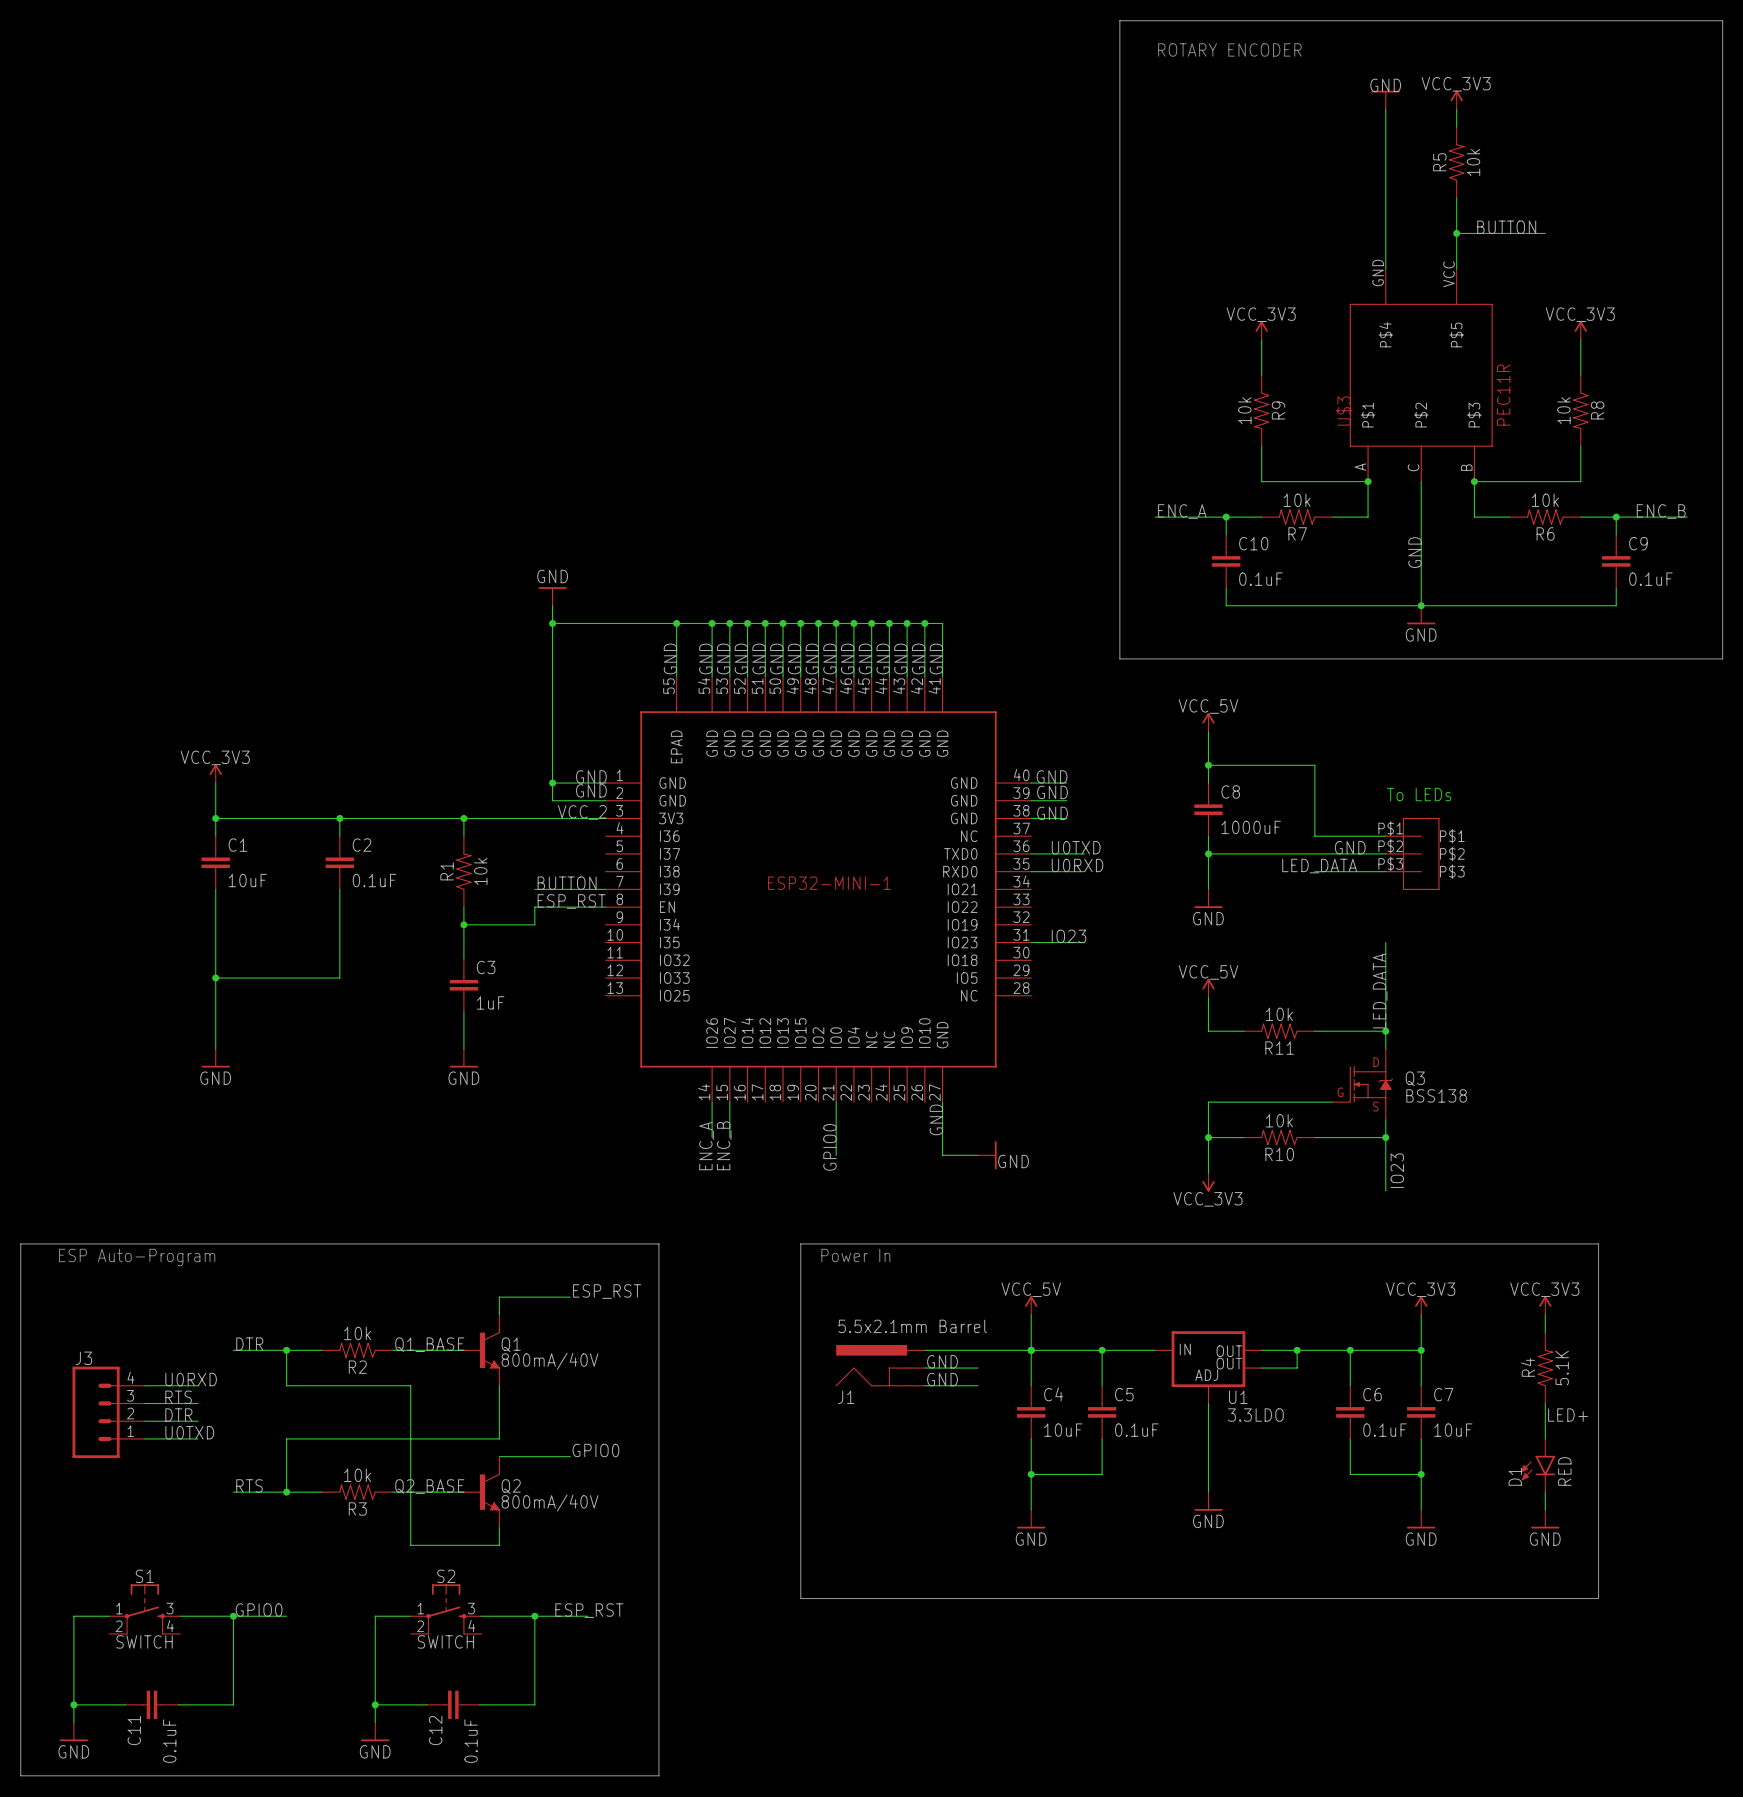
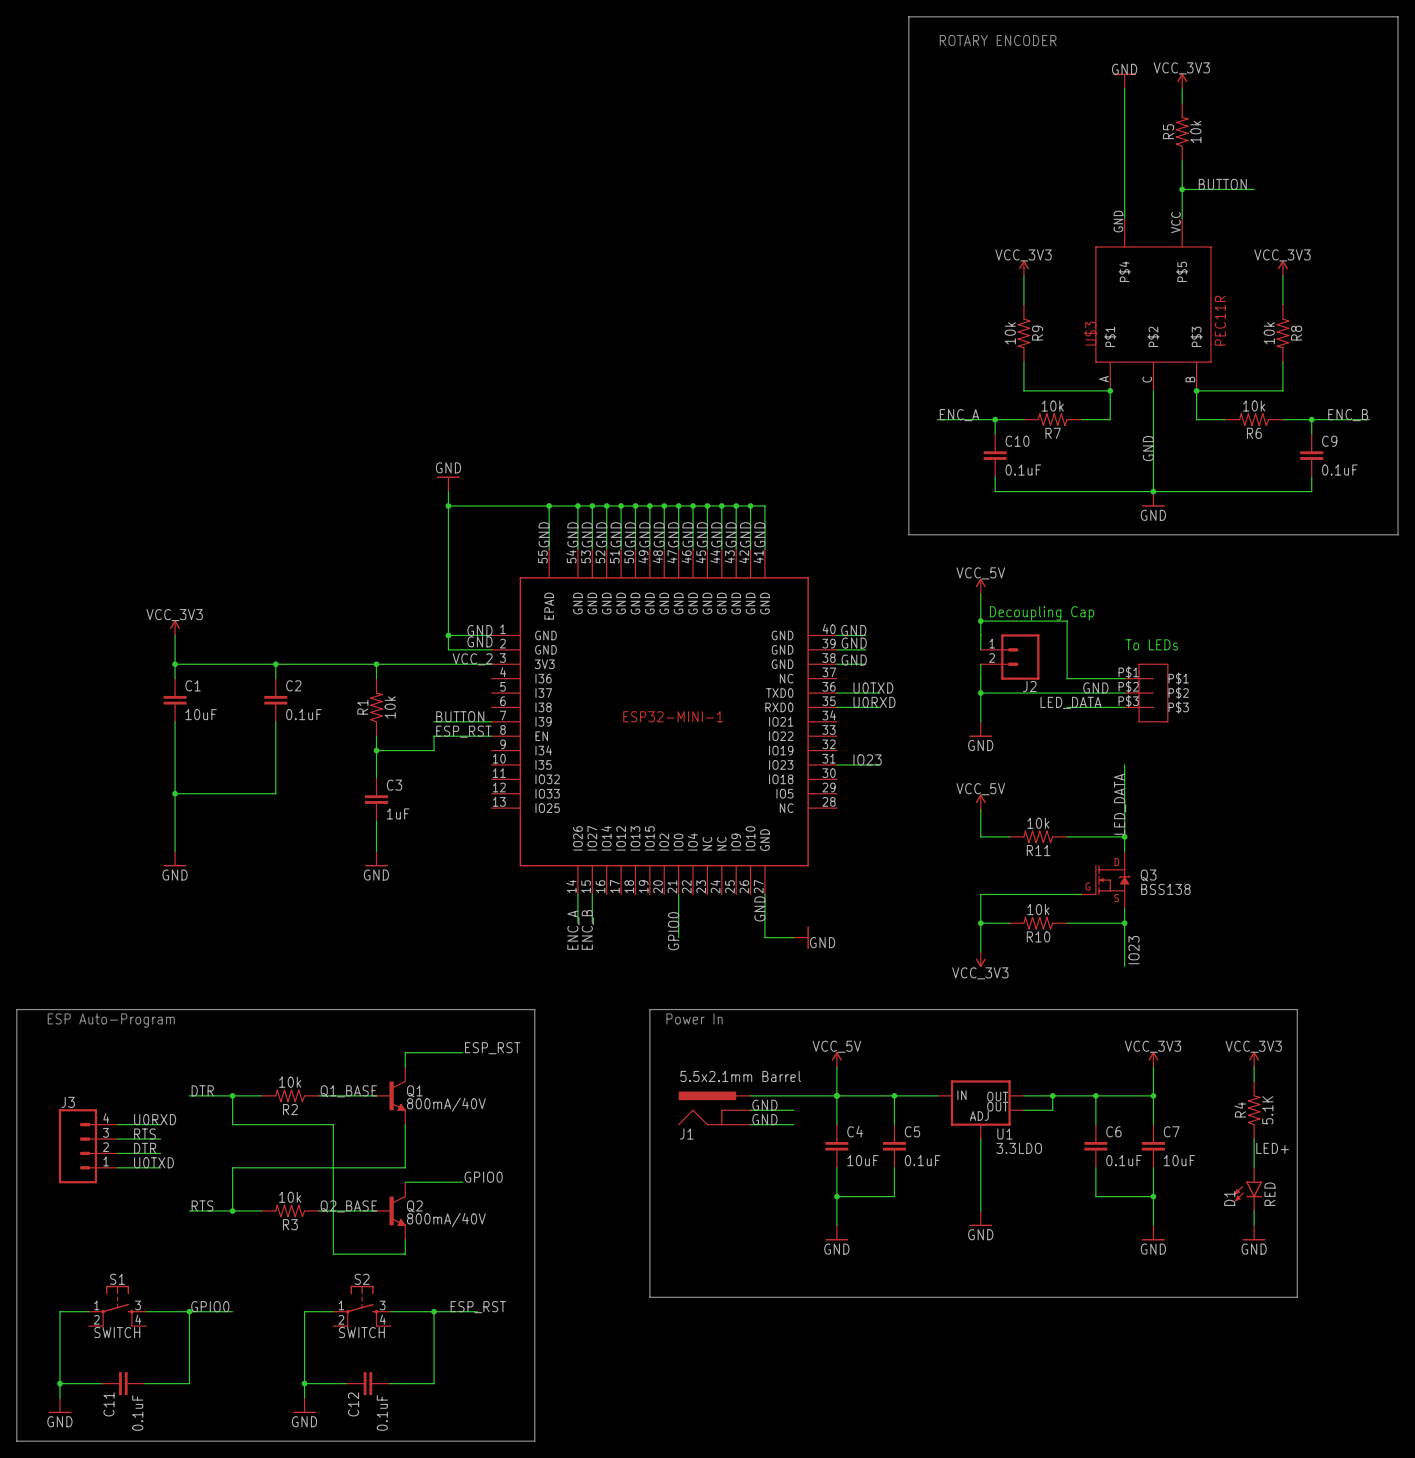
text: none -> Decoupling Cap (1042, 613)
C8: 1000uF (1208, 809) -> none
J2: none -> (1010, 657)

